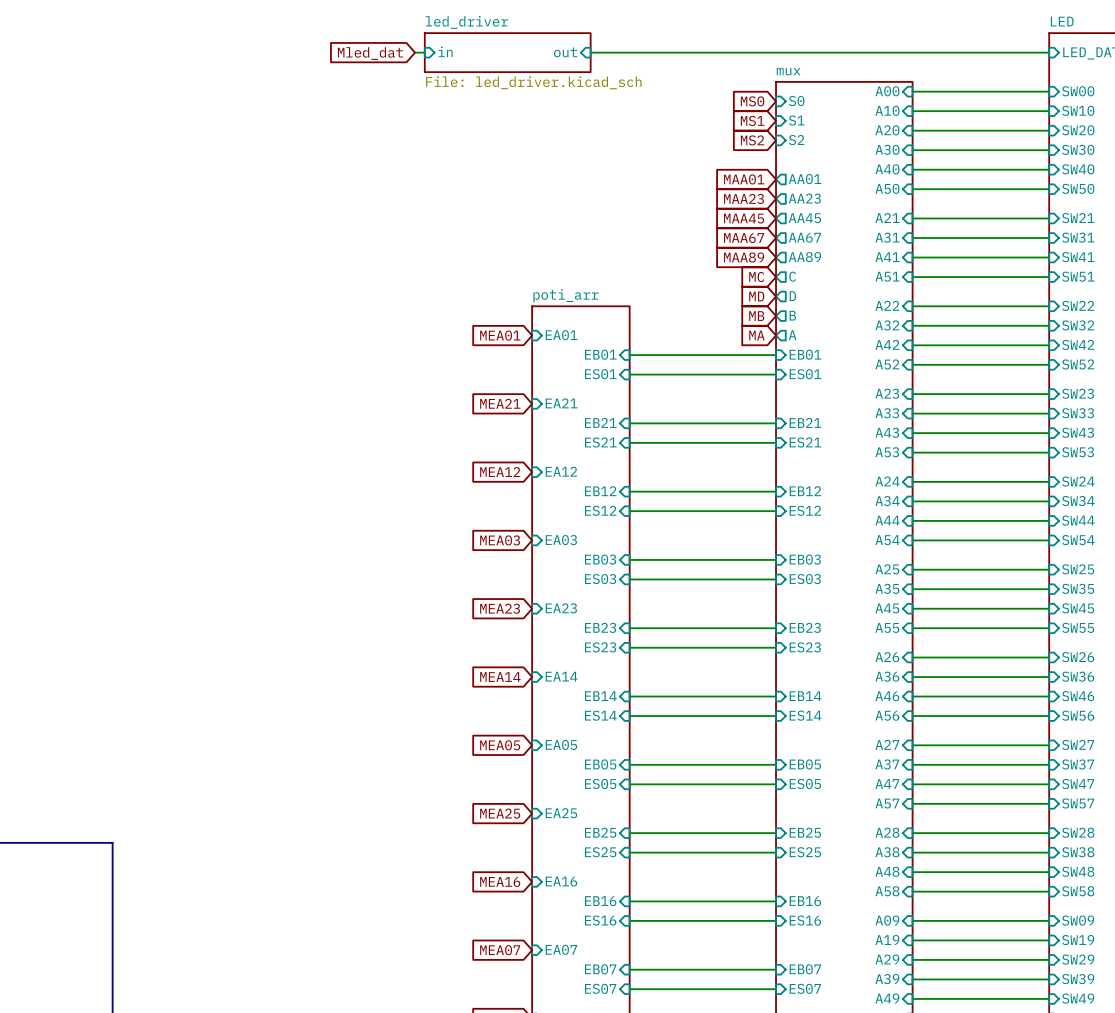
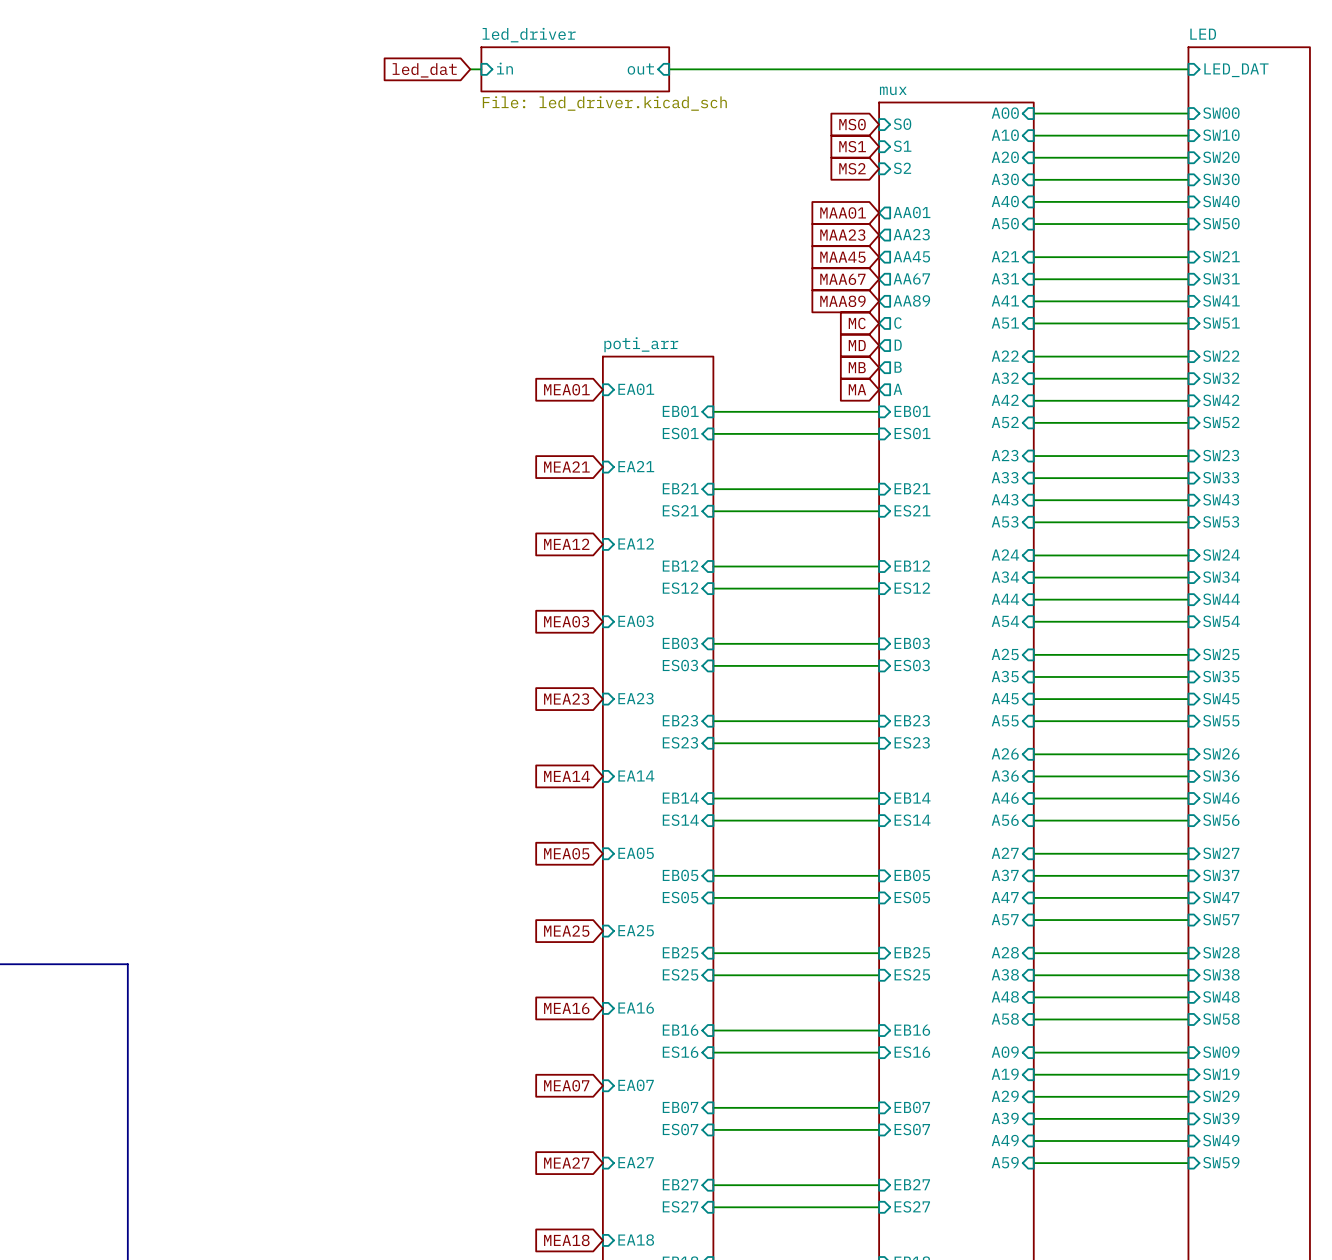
global label: Mled_dat (370, 53) -> led_dat (424, 70)

